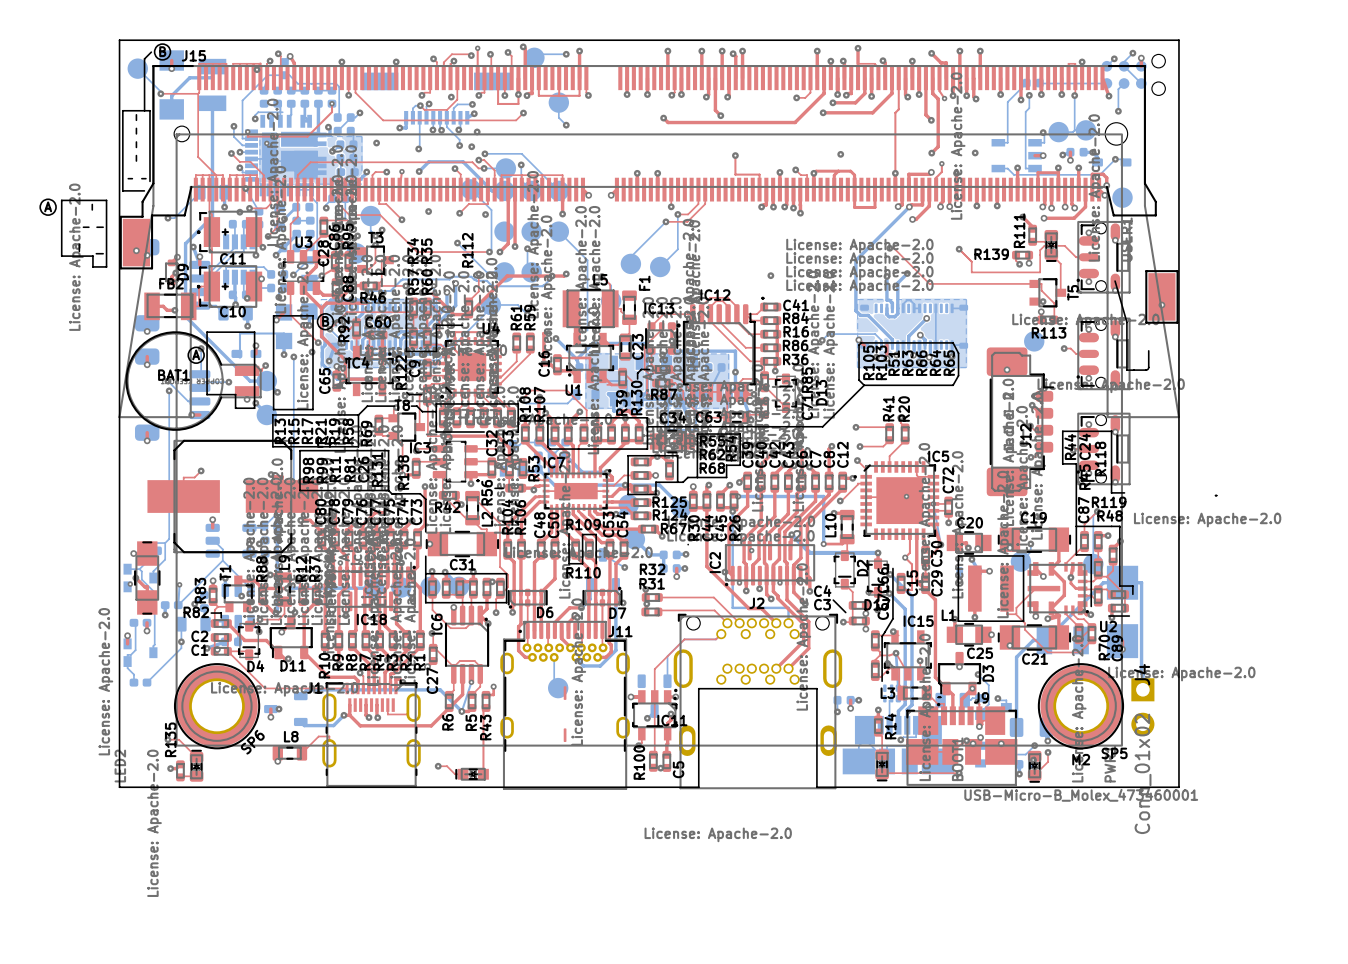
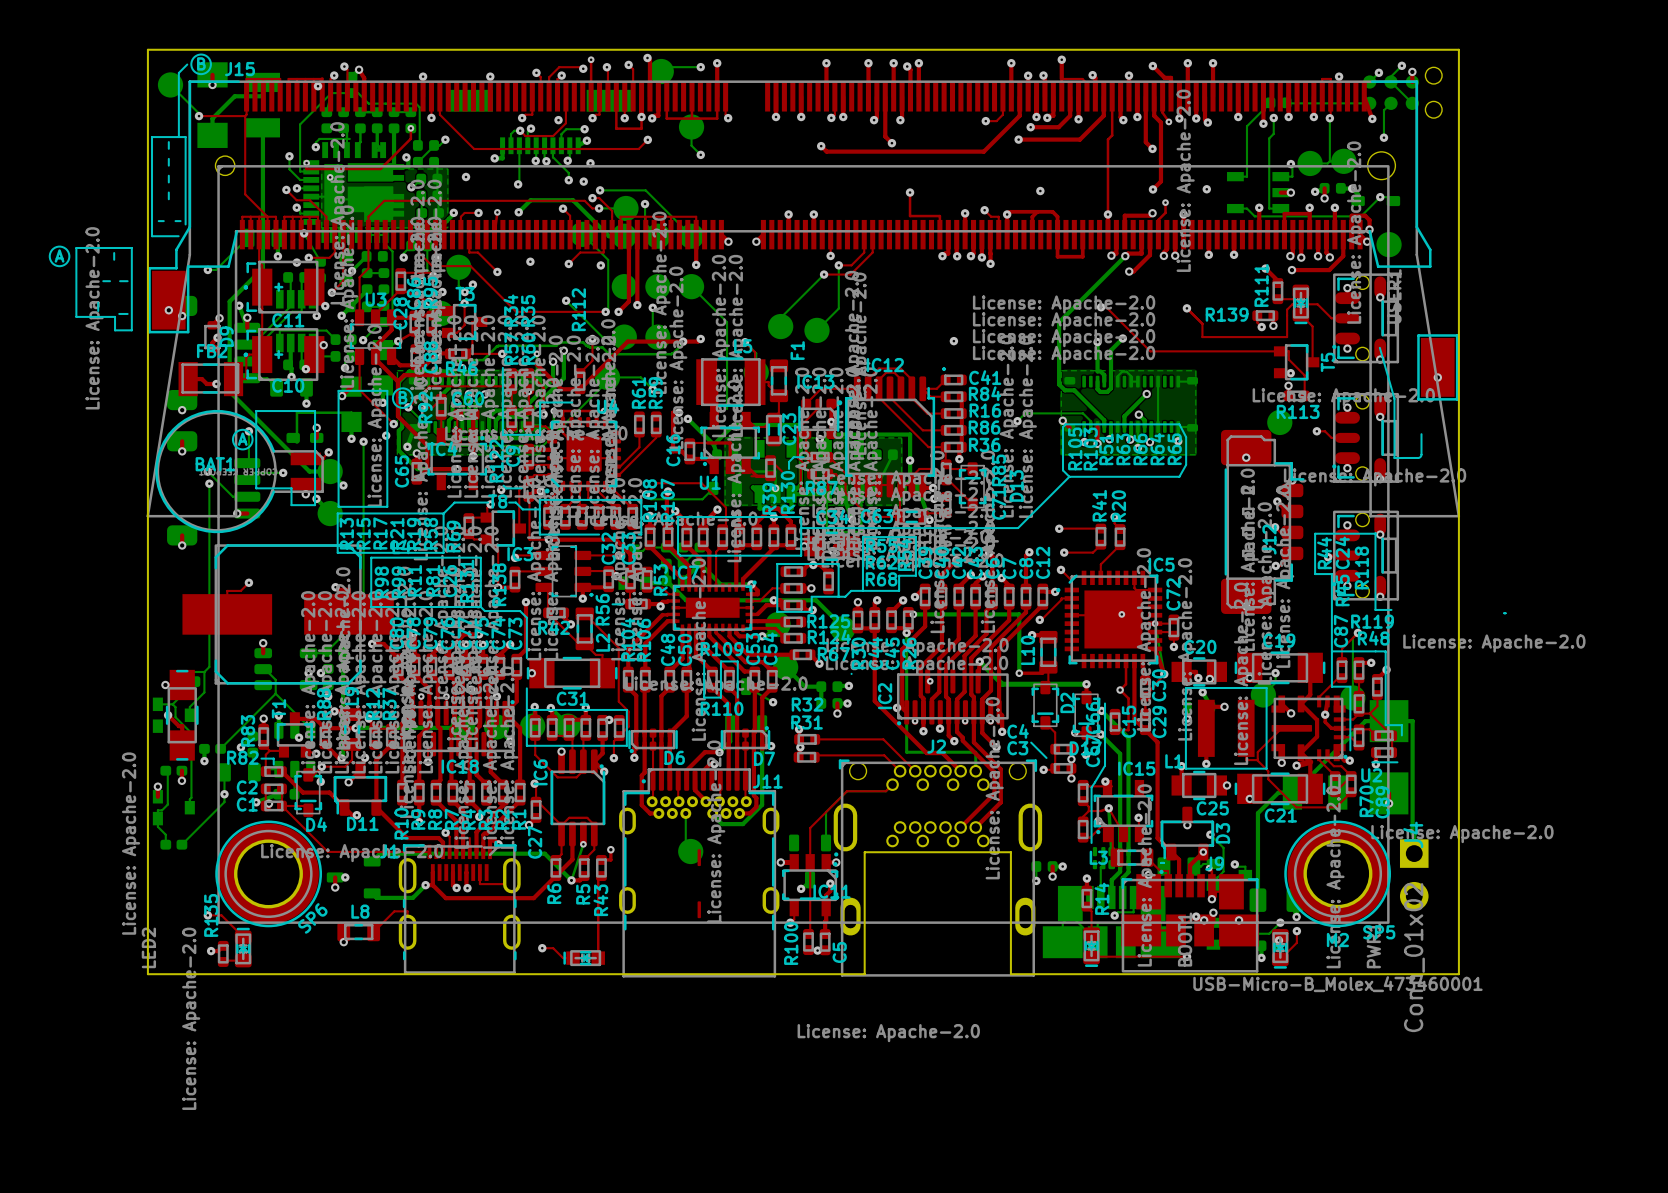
via: (130, 584) -> none
bottom track: (179, 584) (178, 605) -> none
via: (179, 584) -> none

